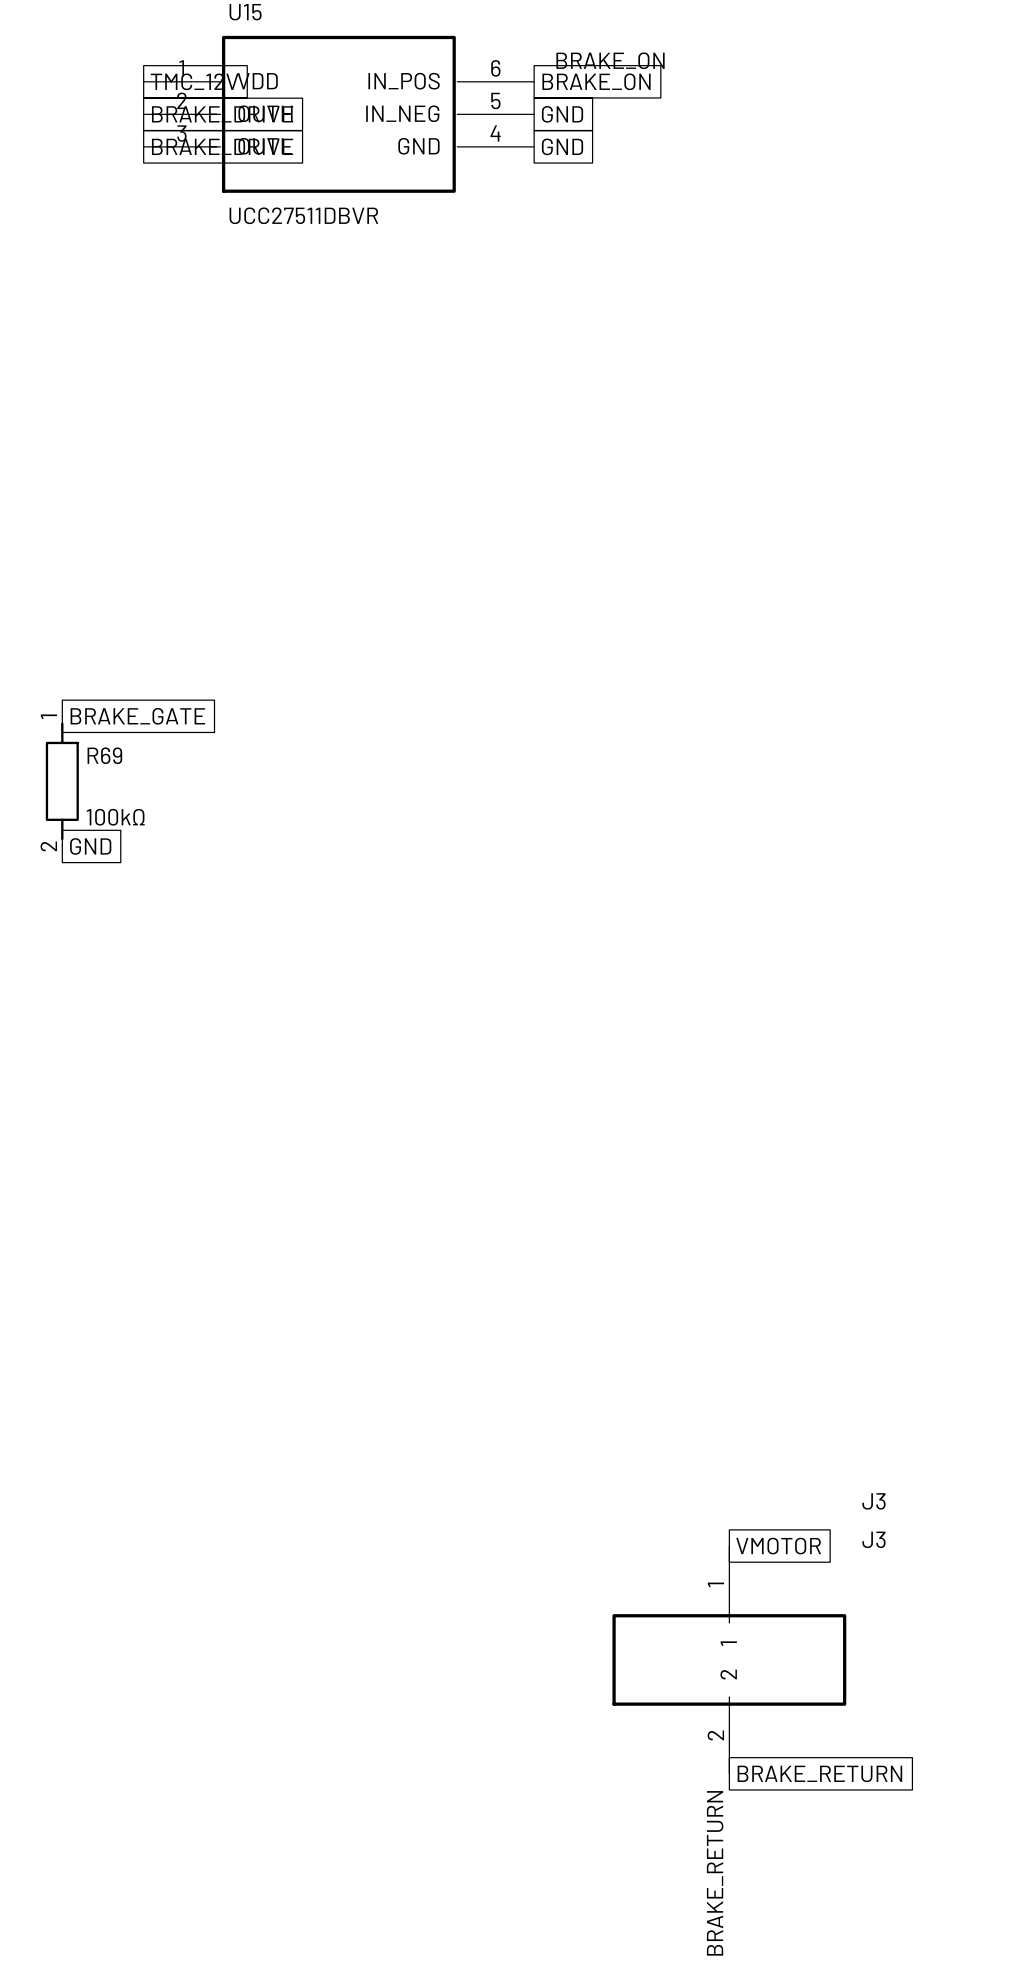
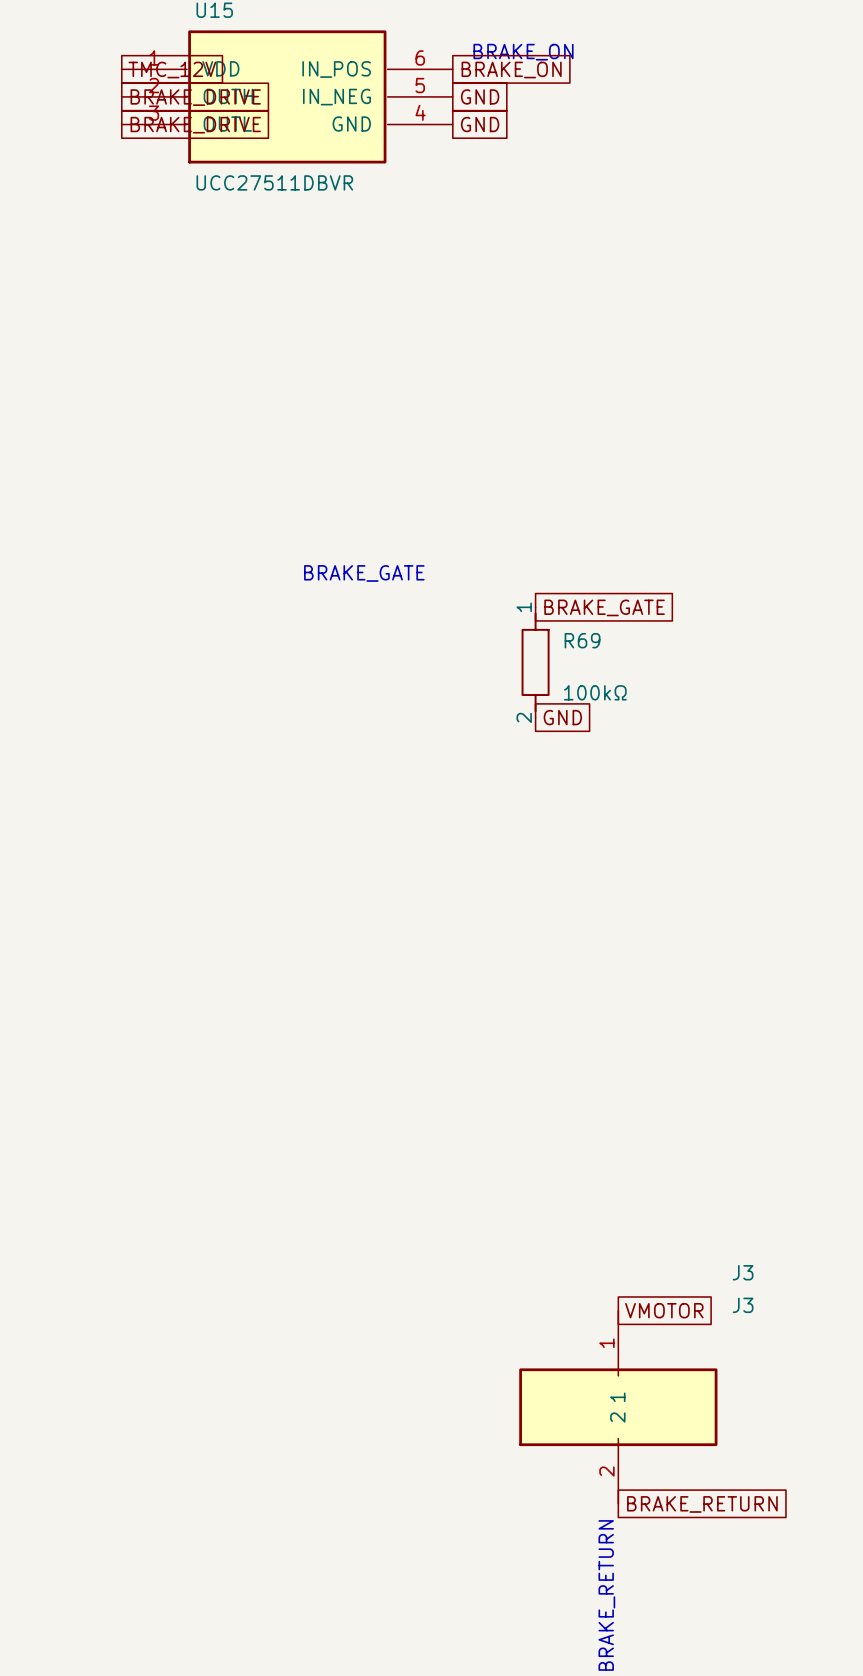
text: none -> BRAKE_GATE (364, 573)
global label: BRAKE_GATE (137, 716) -> none
global label: none -> BRAKE_GATE (604, 607)
R69 name position: R69 (104, 755) -> R69 (582, 640)
R69 position: (62, 781) -> (535, 662)
R69 value position: 100kΩ (115, 817) -> 100kΩ (595, 692)
global label: GND (90, 846) -> none
global label: none -> GND (562, 717)

